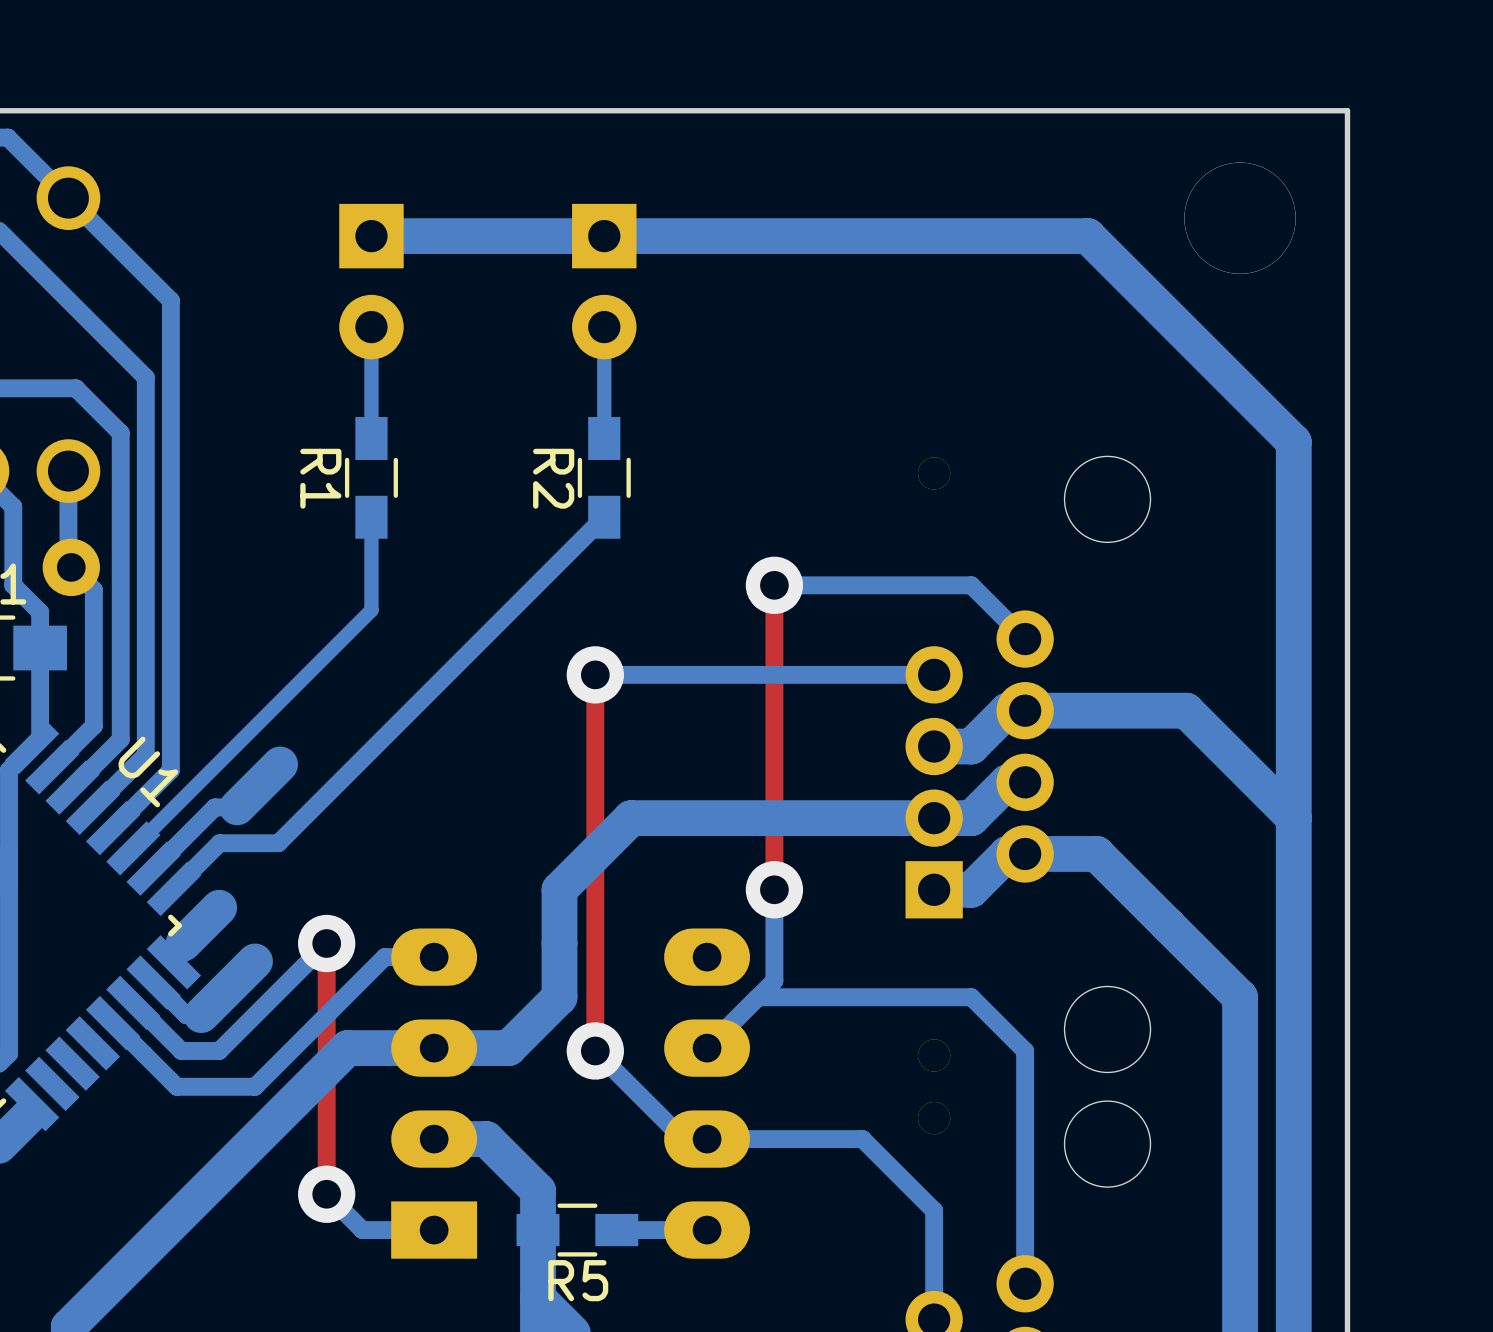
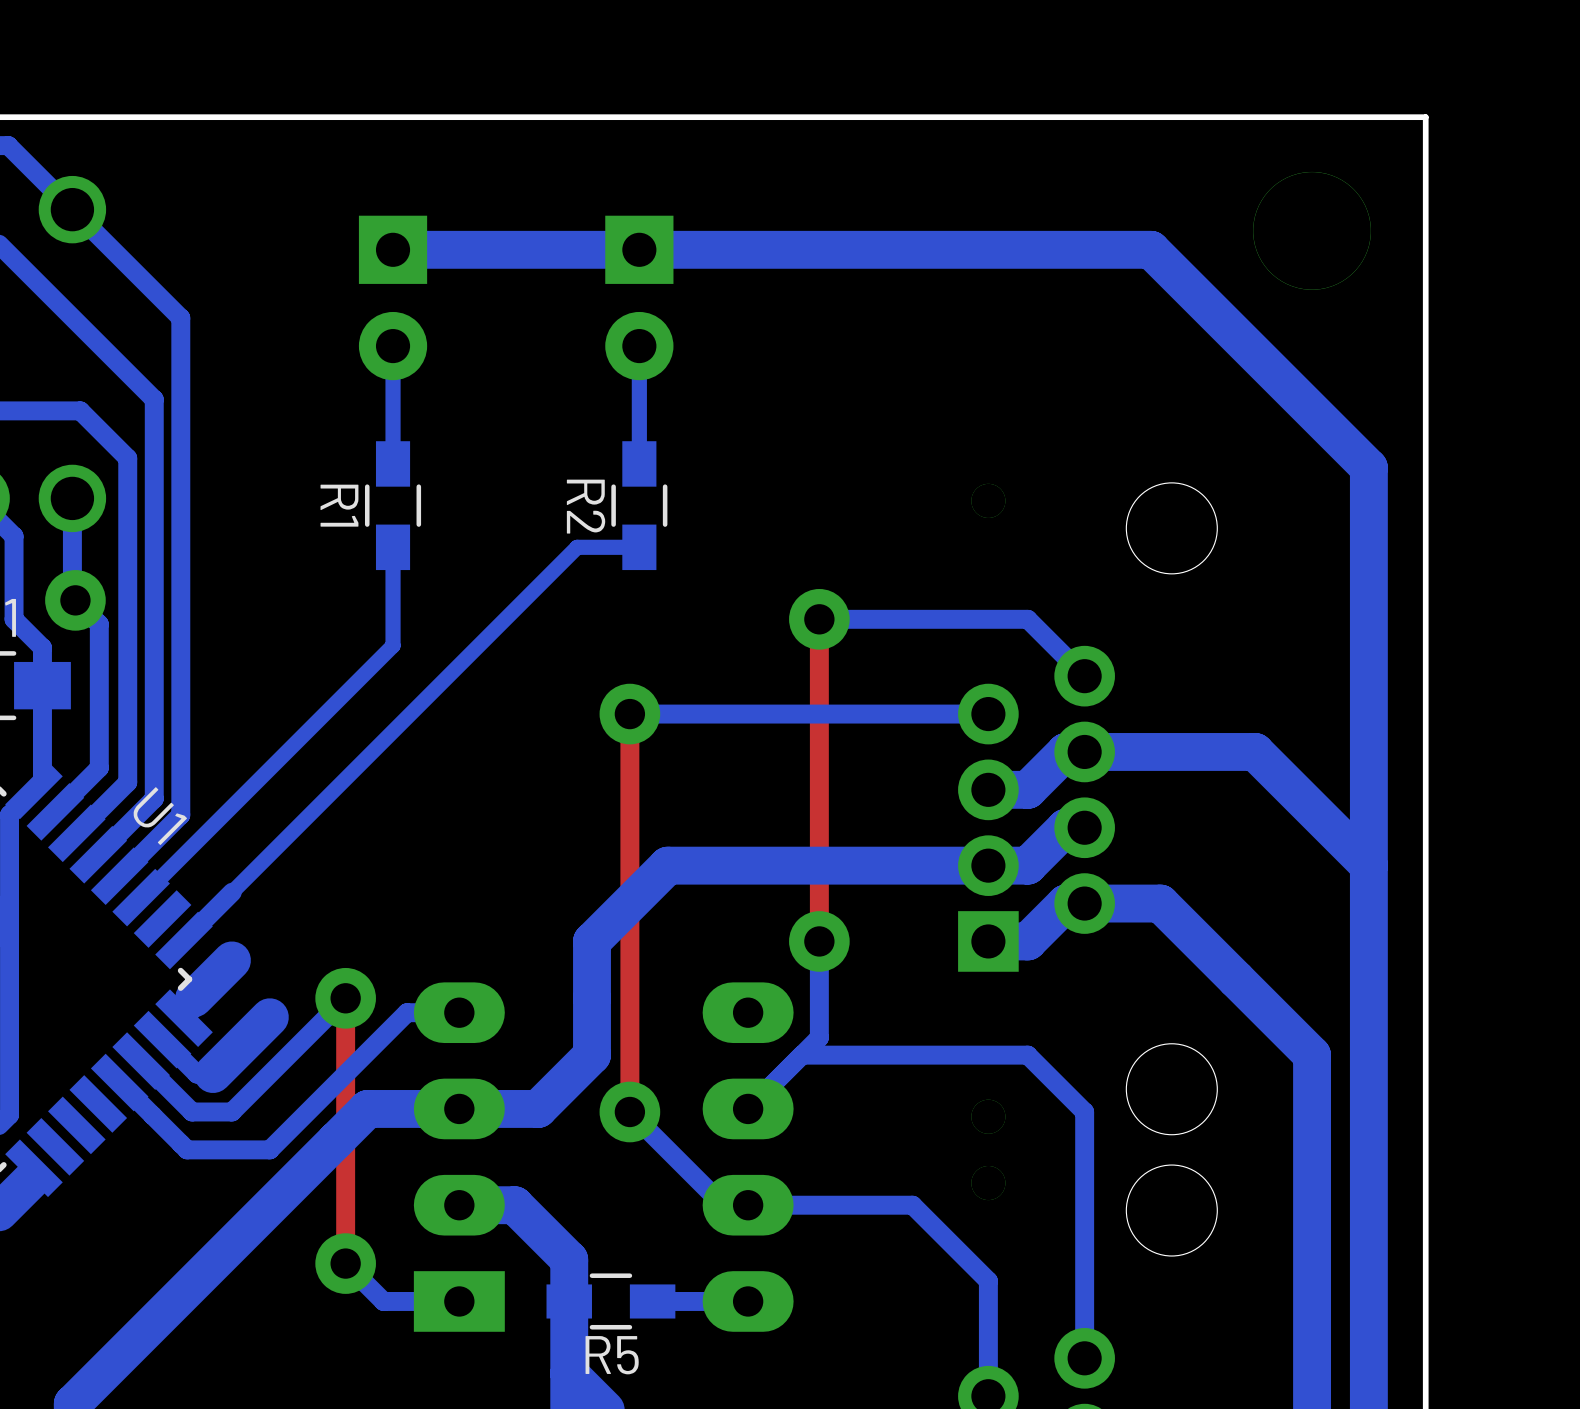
bottom track: (604, 517) (278, 843) (219, 843) -> (639, 547) (577, 547) (232, 892)
bottom track: (280, 764) (237, 807) (214, 807) (153, 868) -> none

